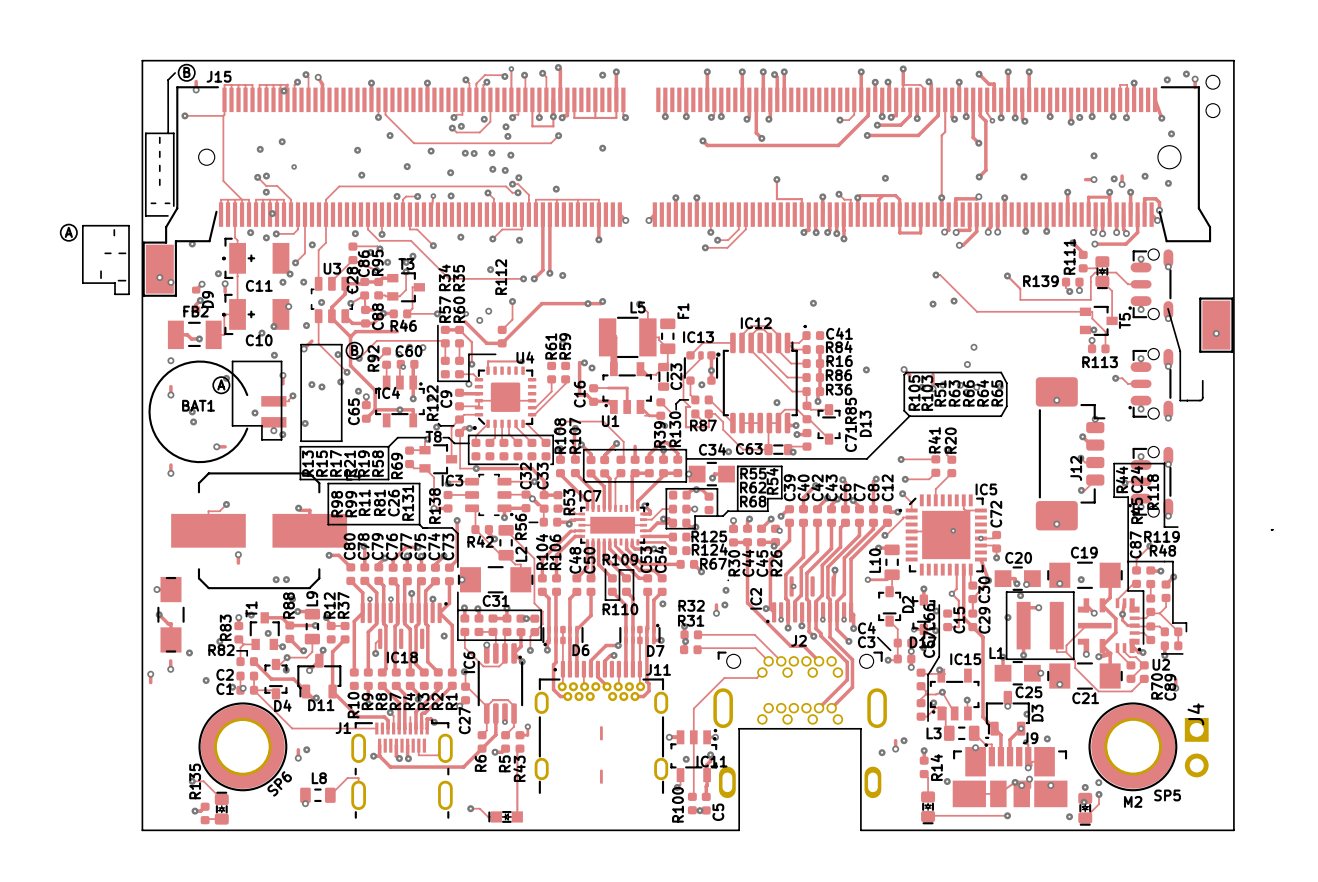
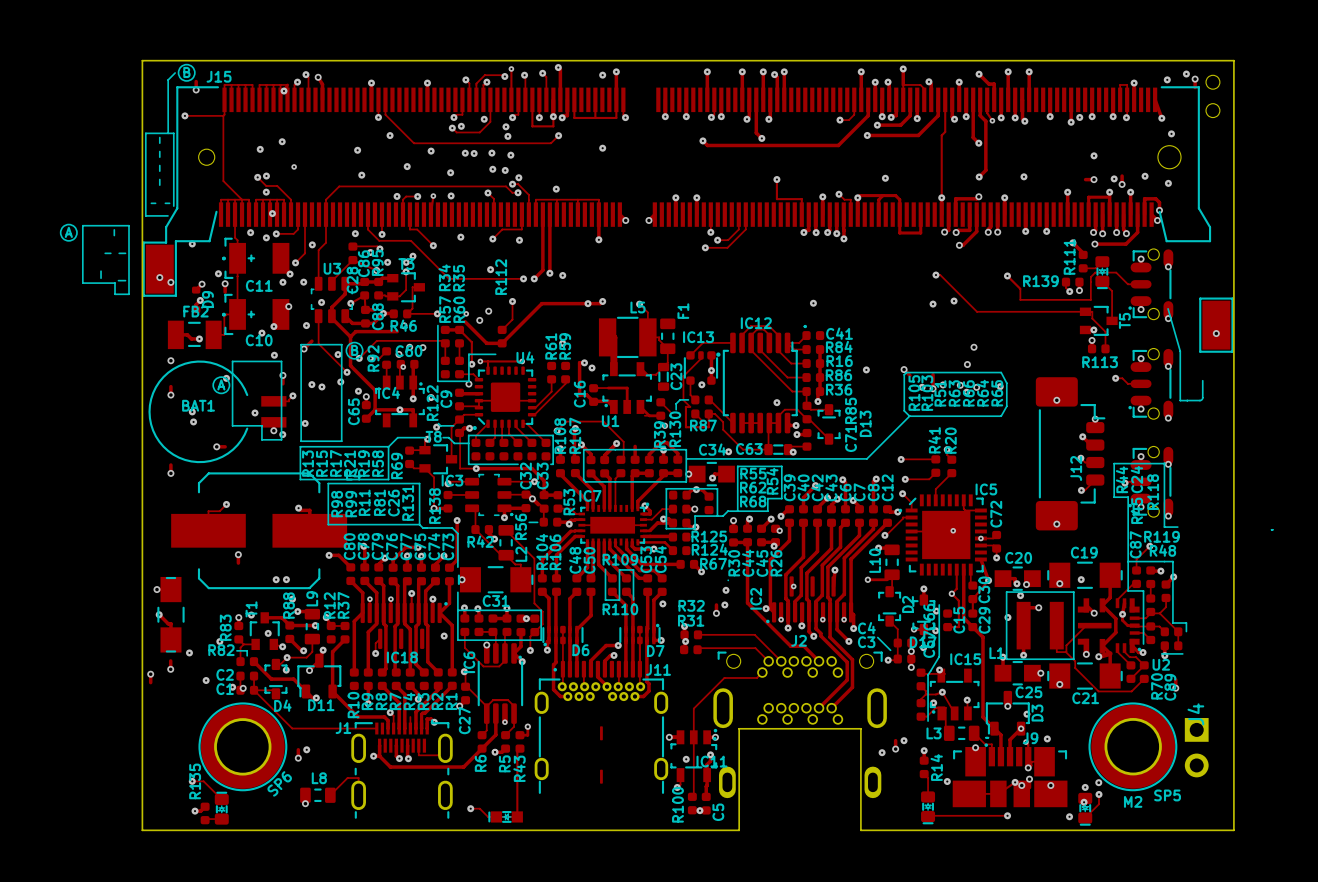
track: none -> (480, 361) (488, 361)
via: none -> (480, 361)

